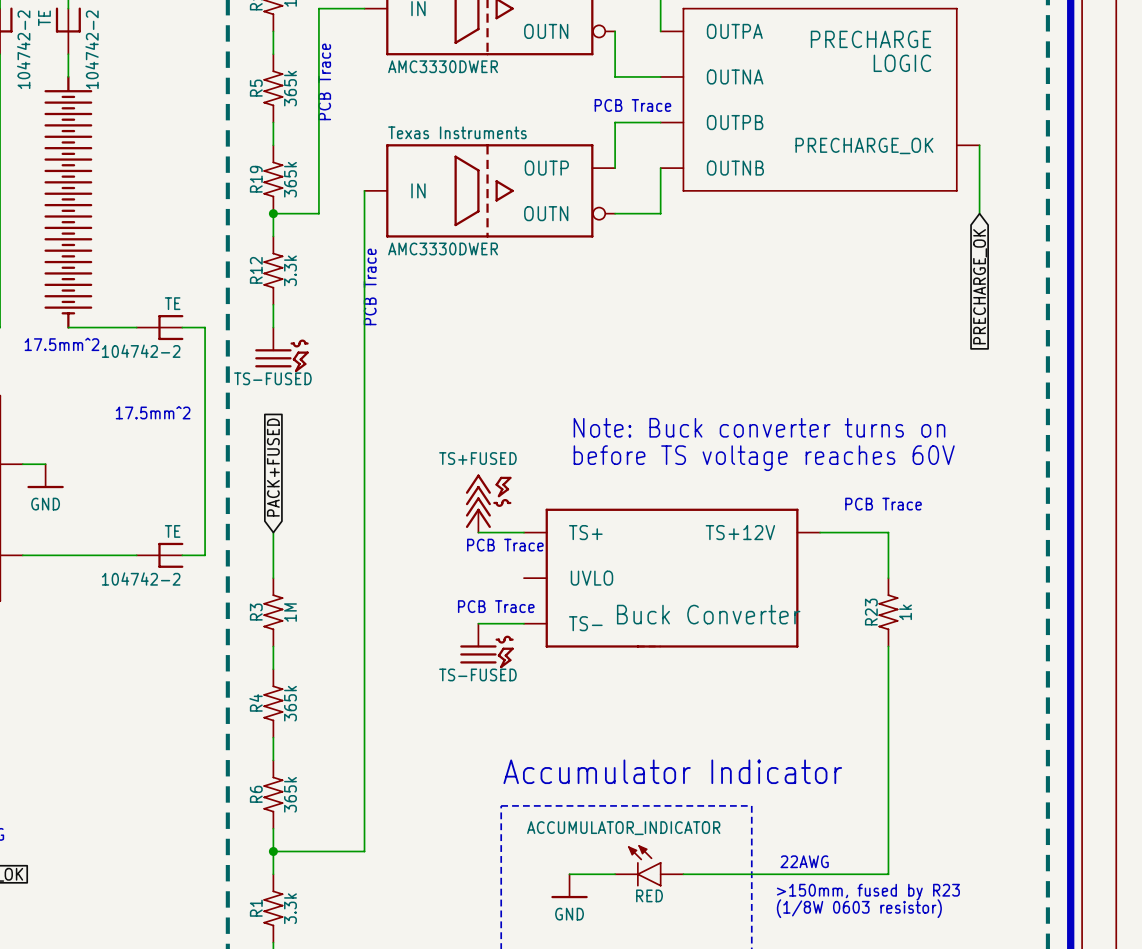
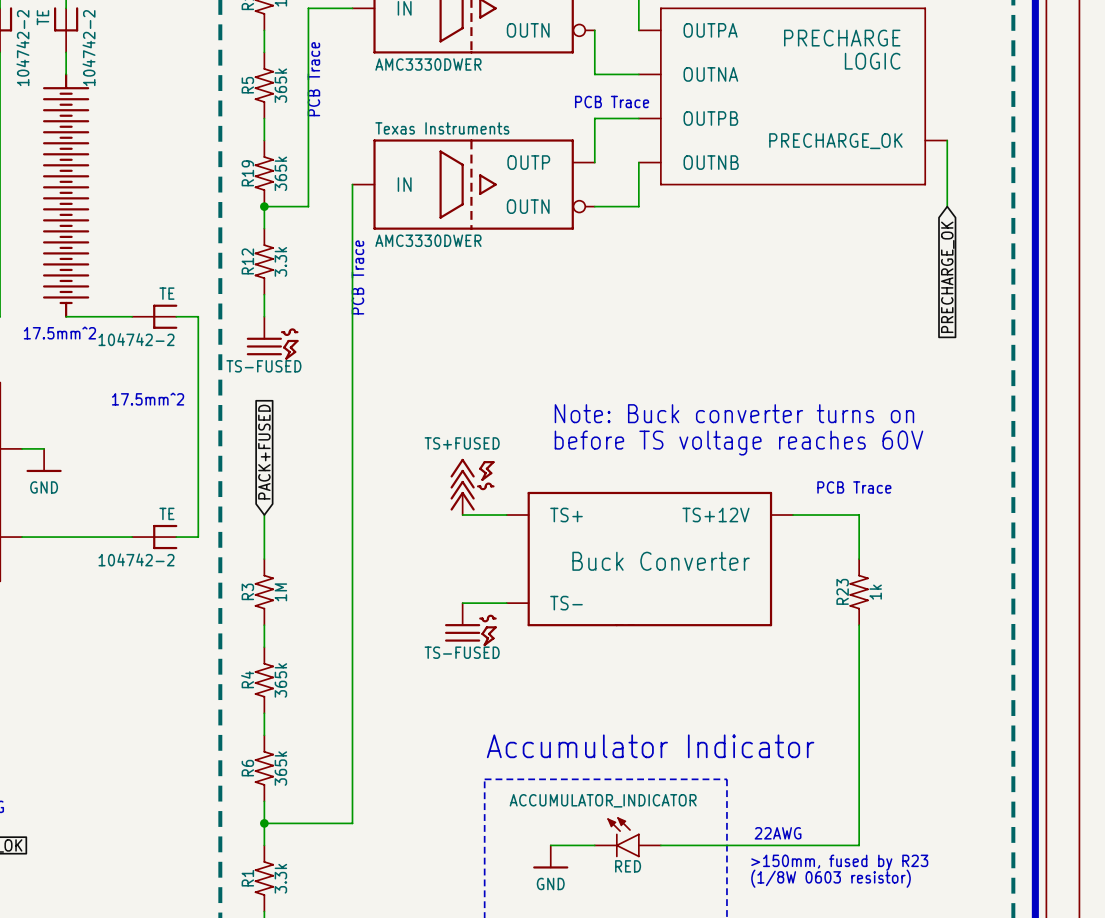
part symbol: [523, 508, 821, 648] -> [506, 491, 794, 627]
text: PCB Trace (505, 545) -> none
text: PCB Trace (496, 606) -> none

